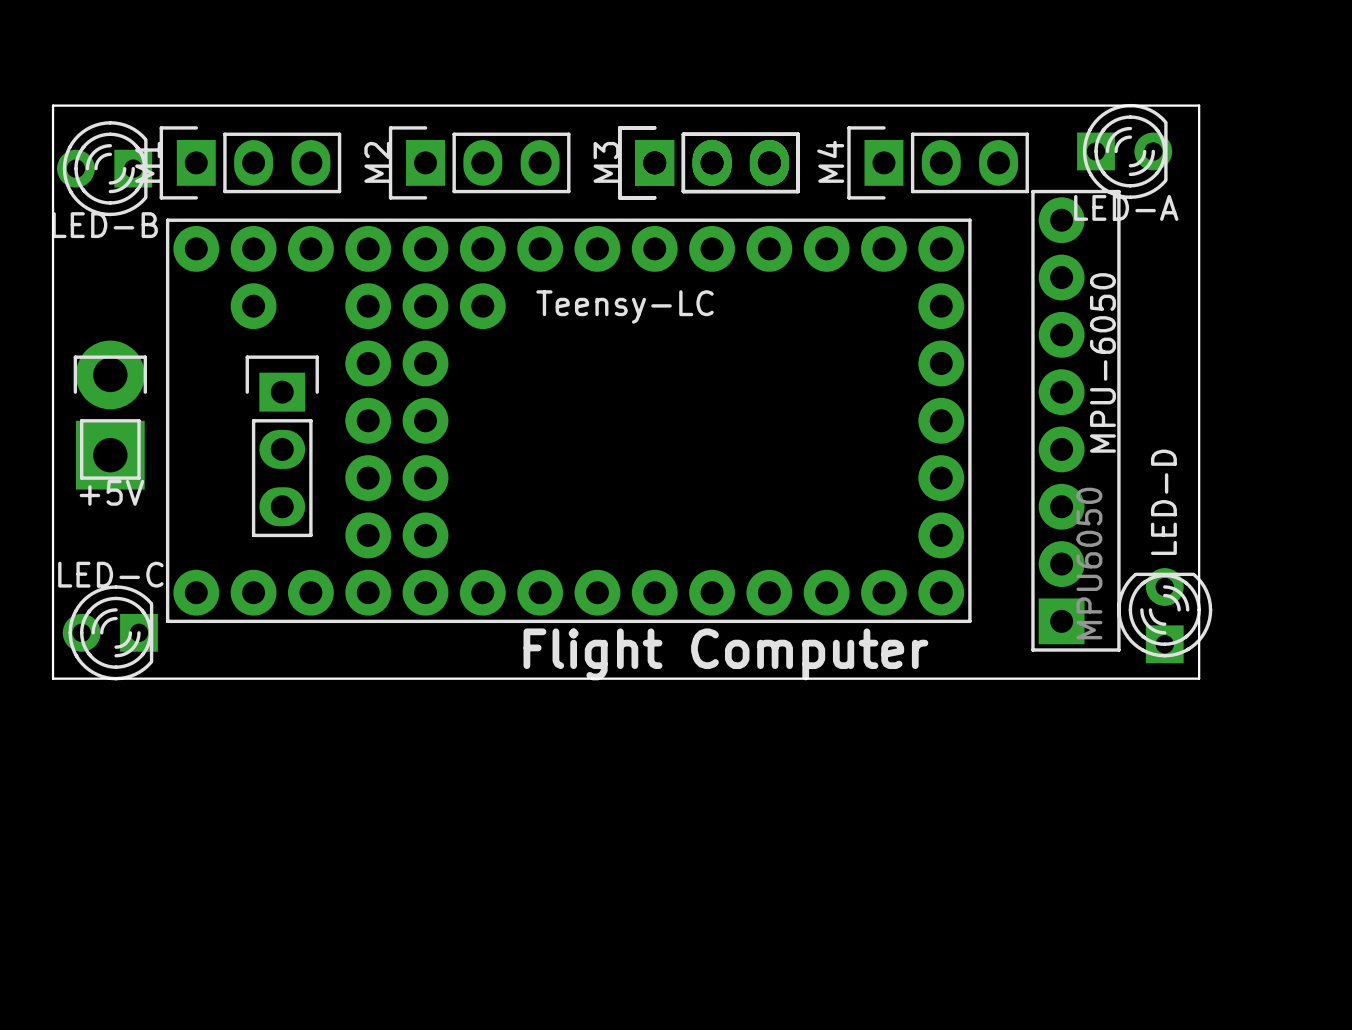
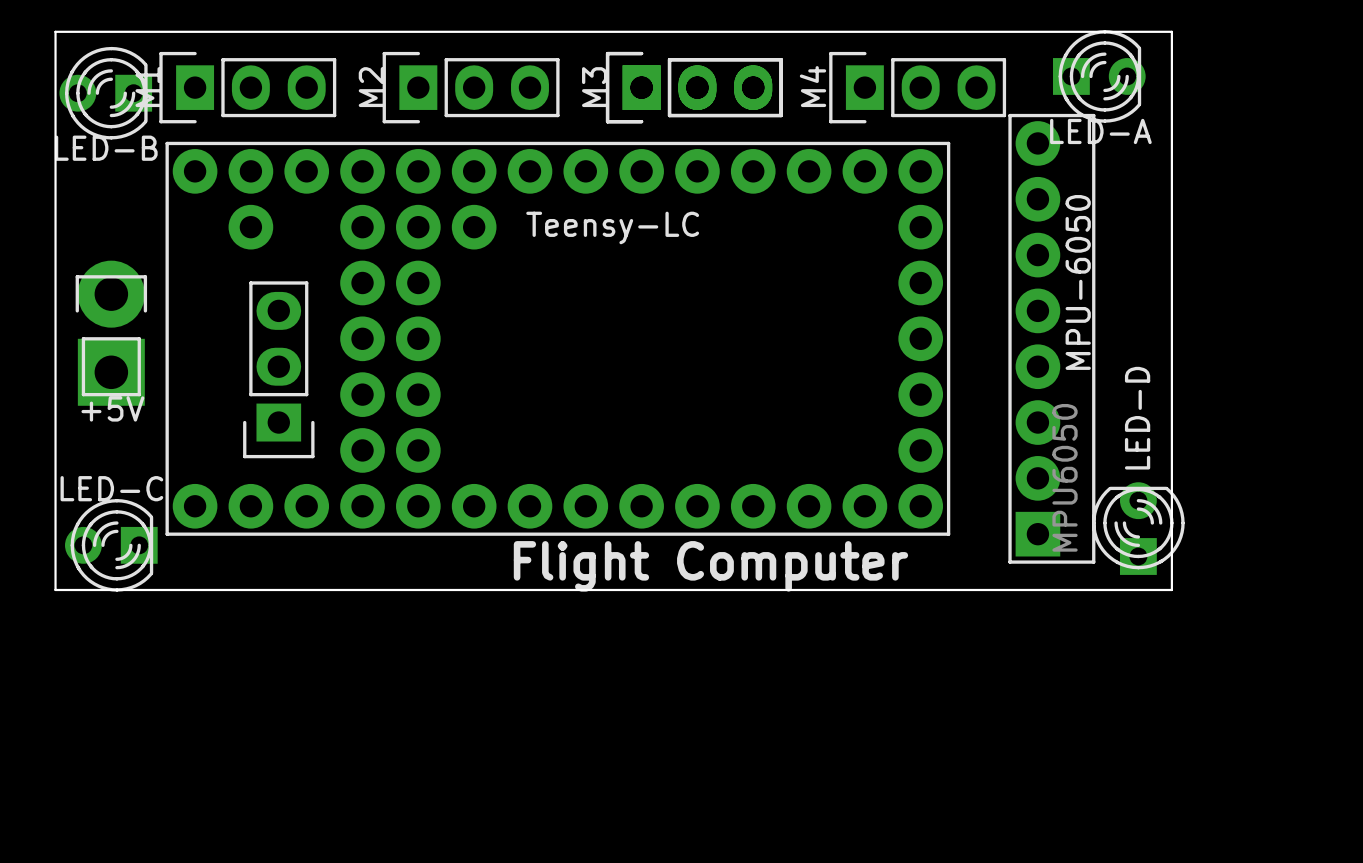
part rotation: 0° (282, 446) -> 180° (278, 369)

